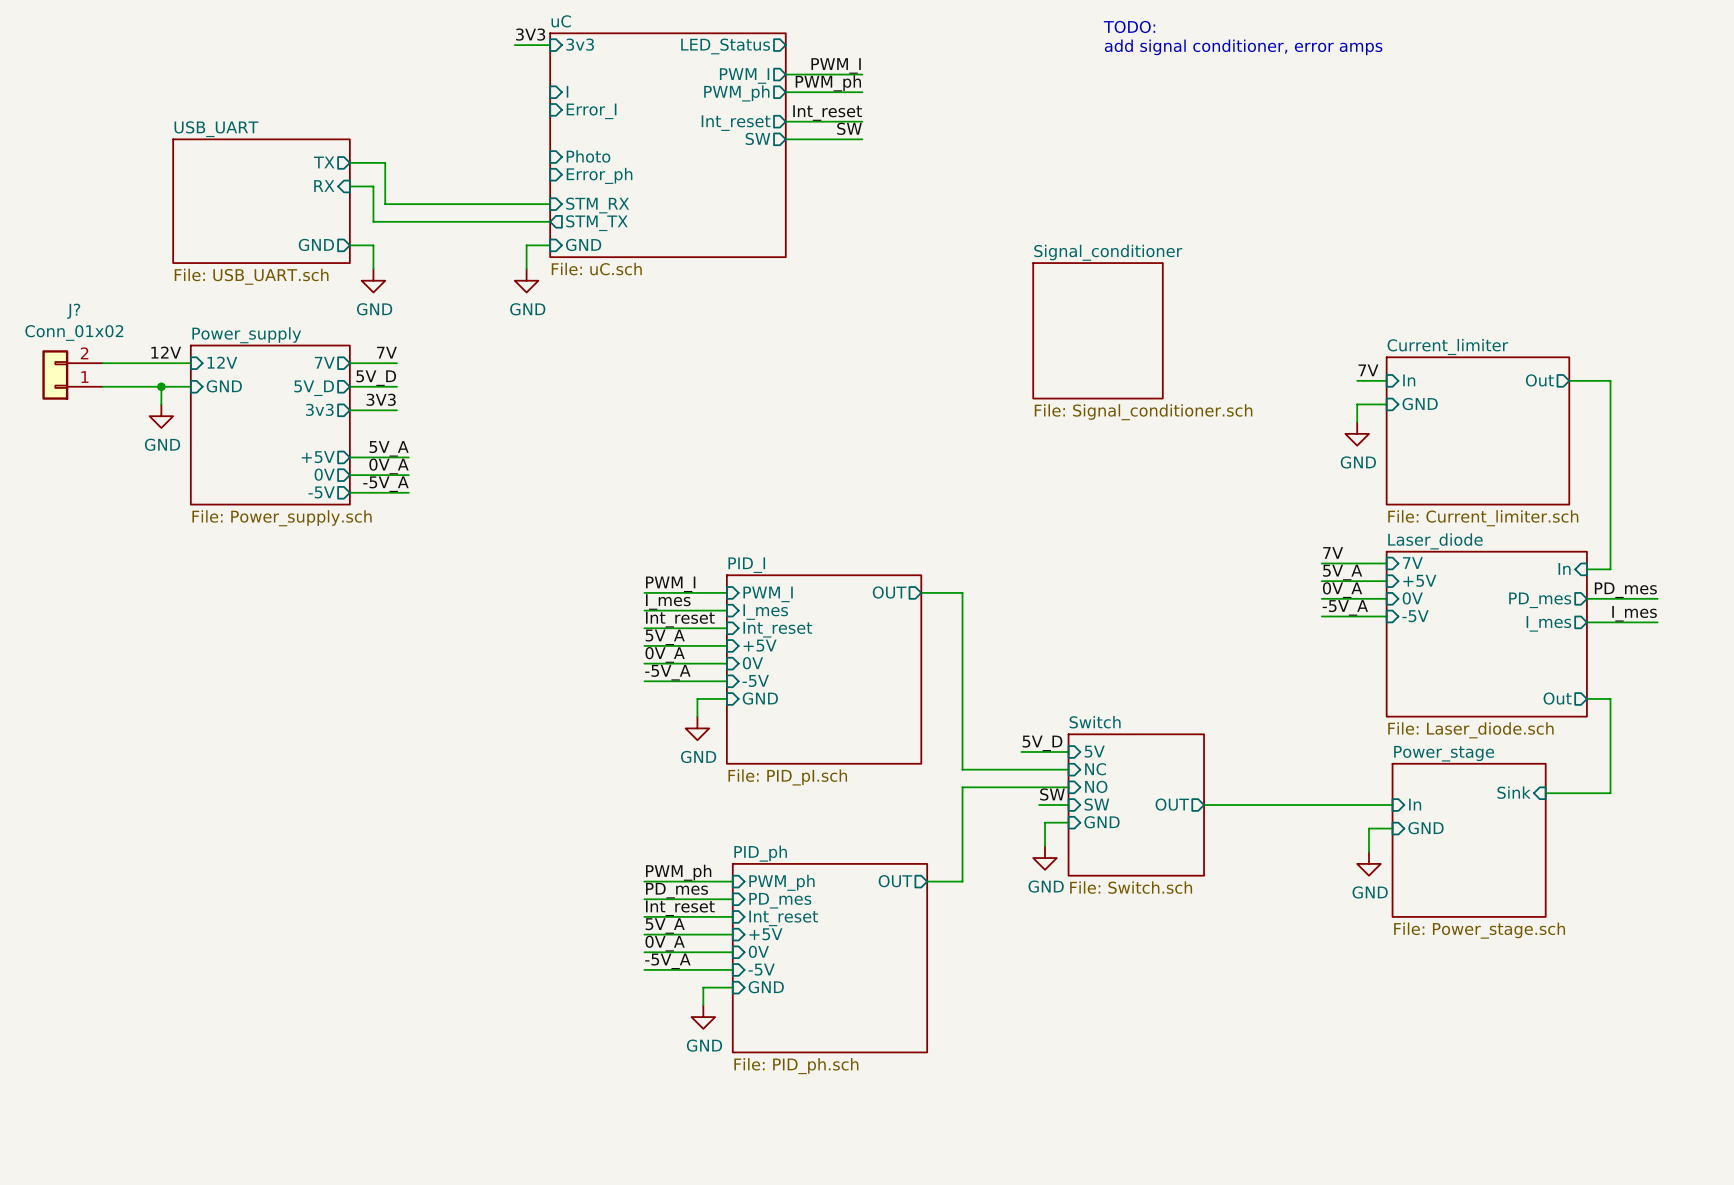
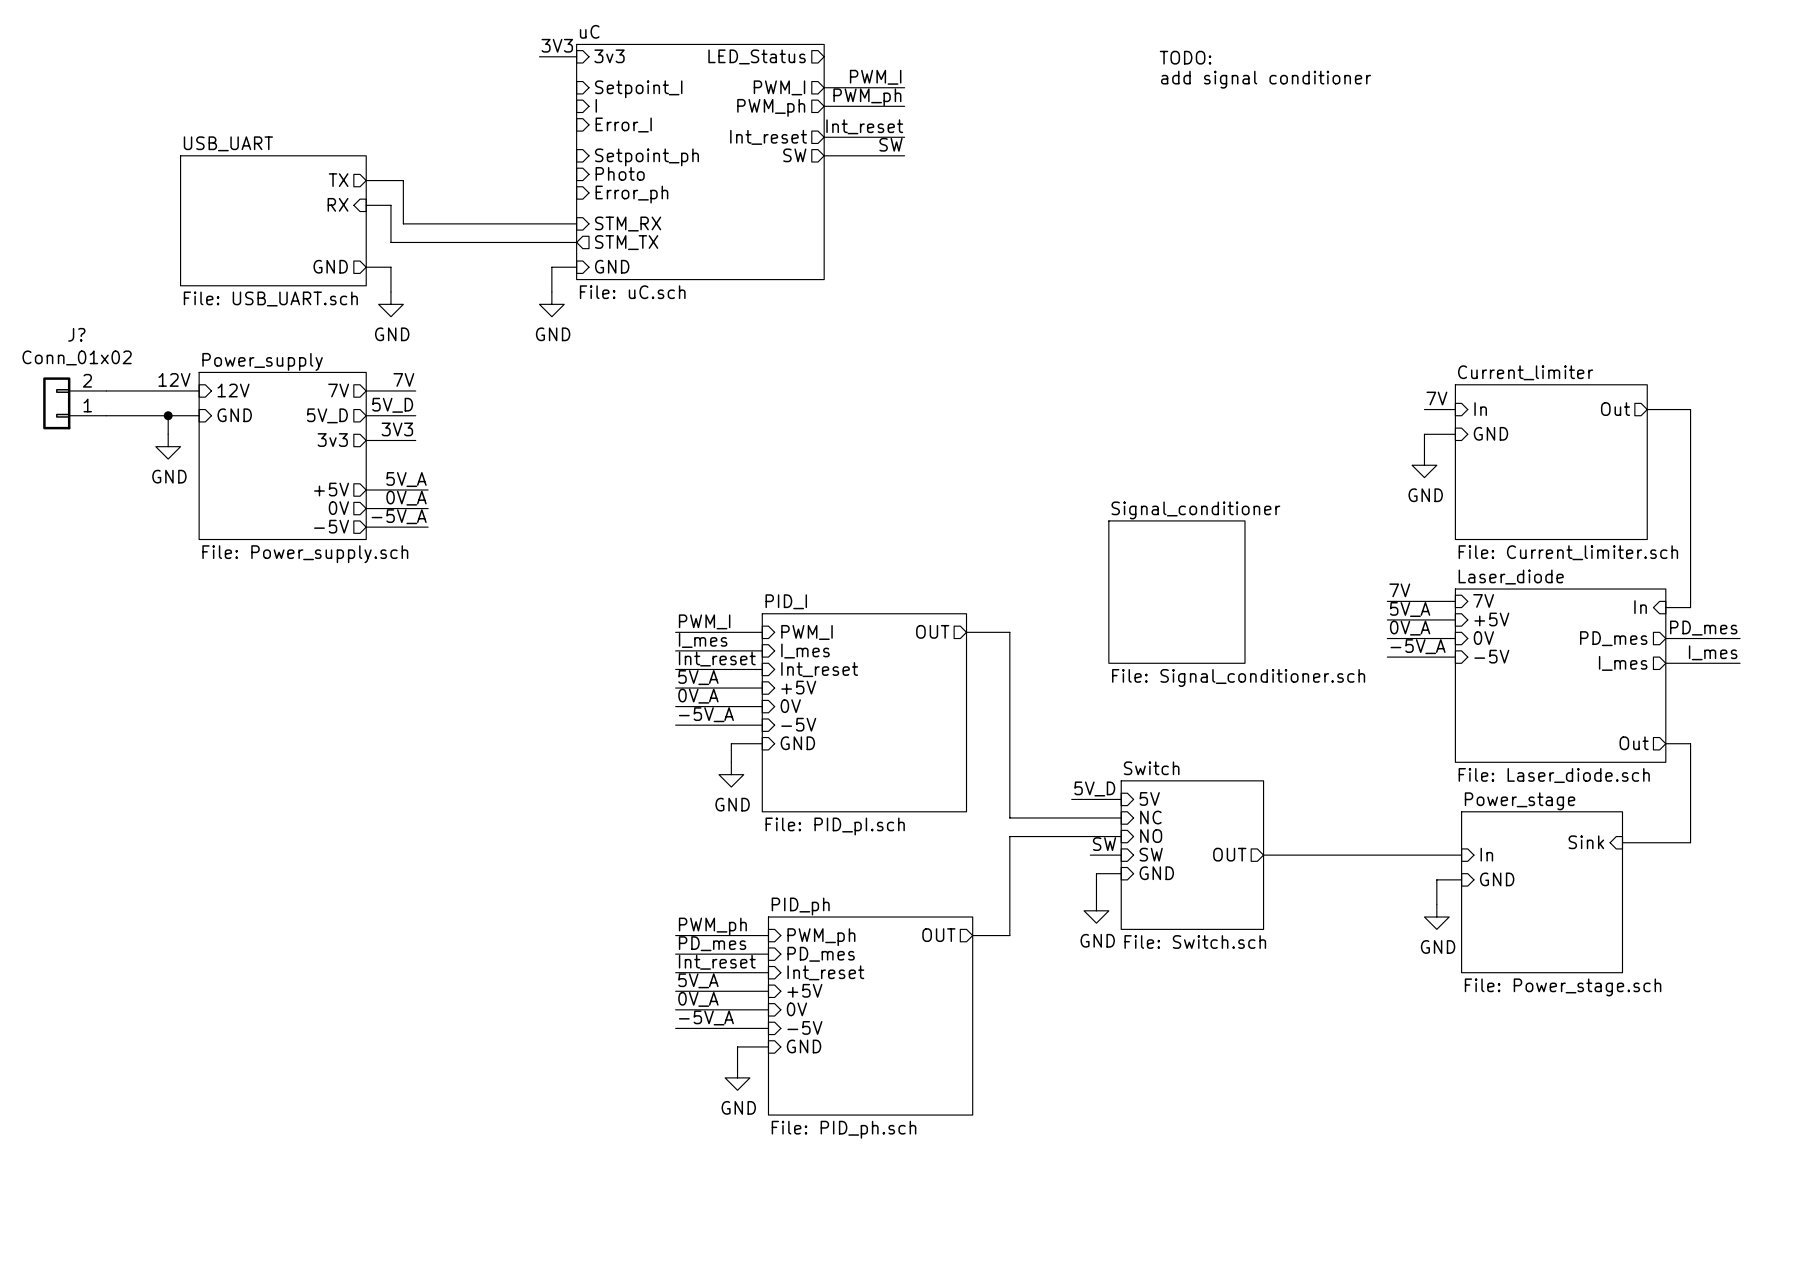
text: TODO: (1129, 26) -> none
text: add signal conditioner, error amps (1243, 47) -> TODO: (1185, 57)
text: none -> add signal conditioner (1266, 79)
sheet pin: none -> Setpoint_I (638, 89)
sheet pin: none -> Setpoint_ph (646, 157)
sheet Signal_conditioner position: (1098, 330) -> (1176, 592)

